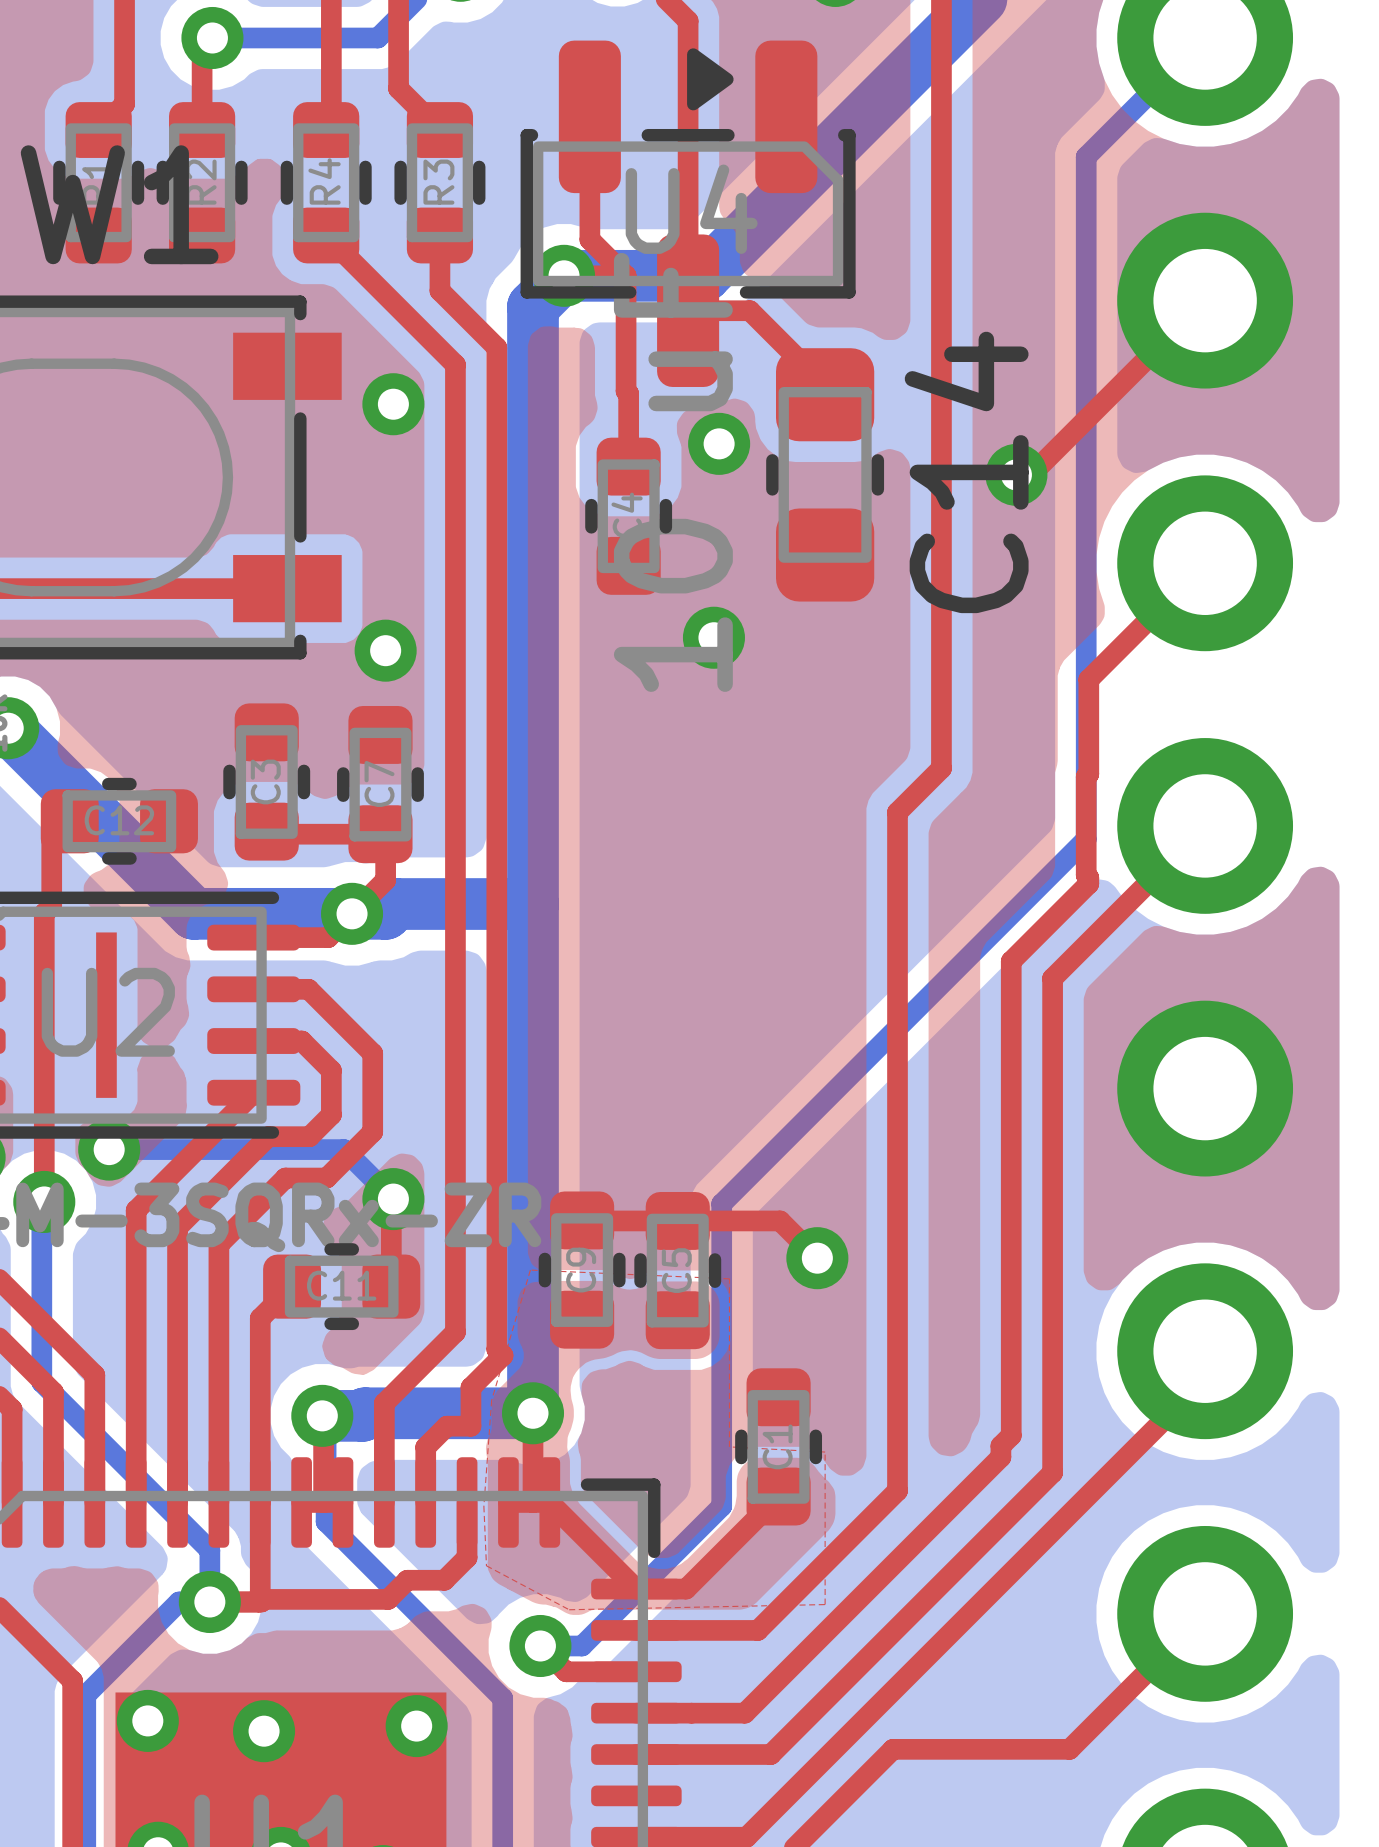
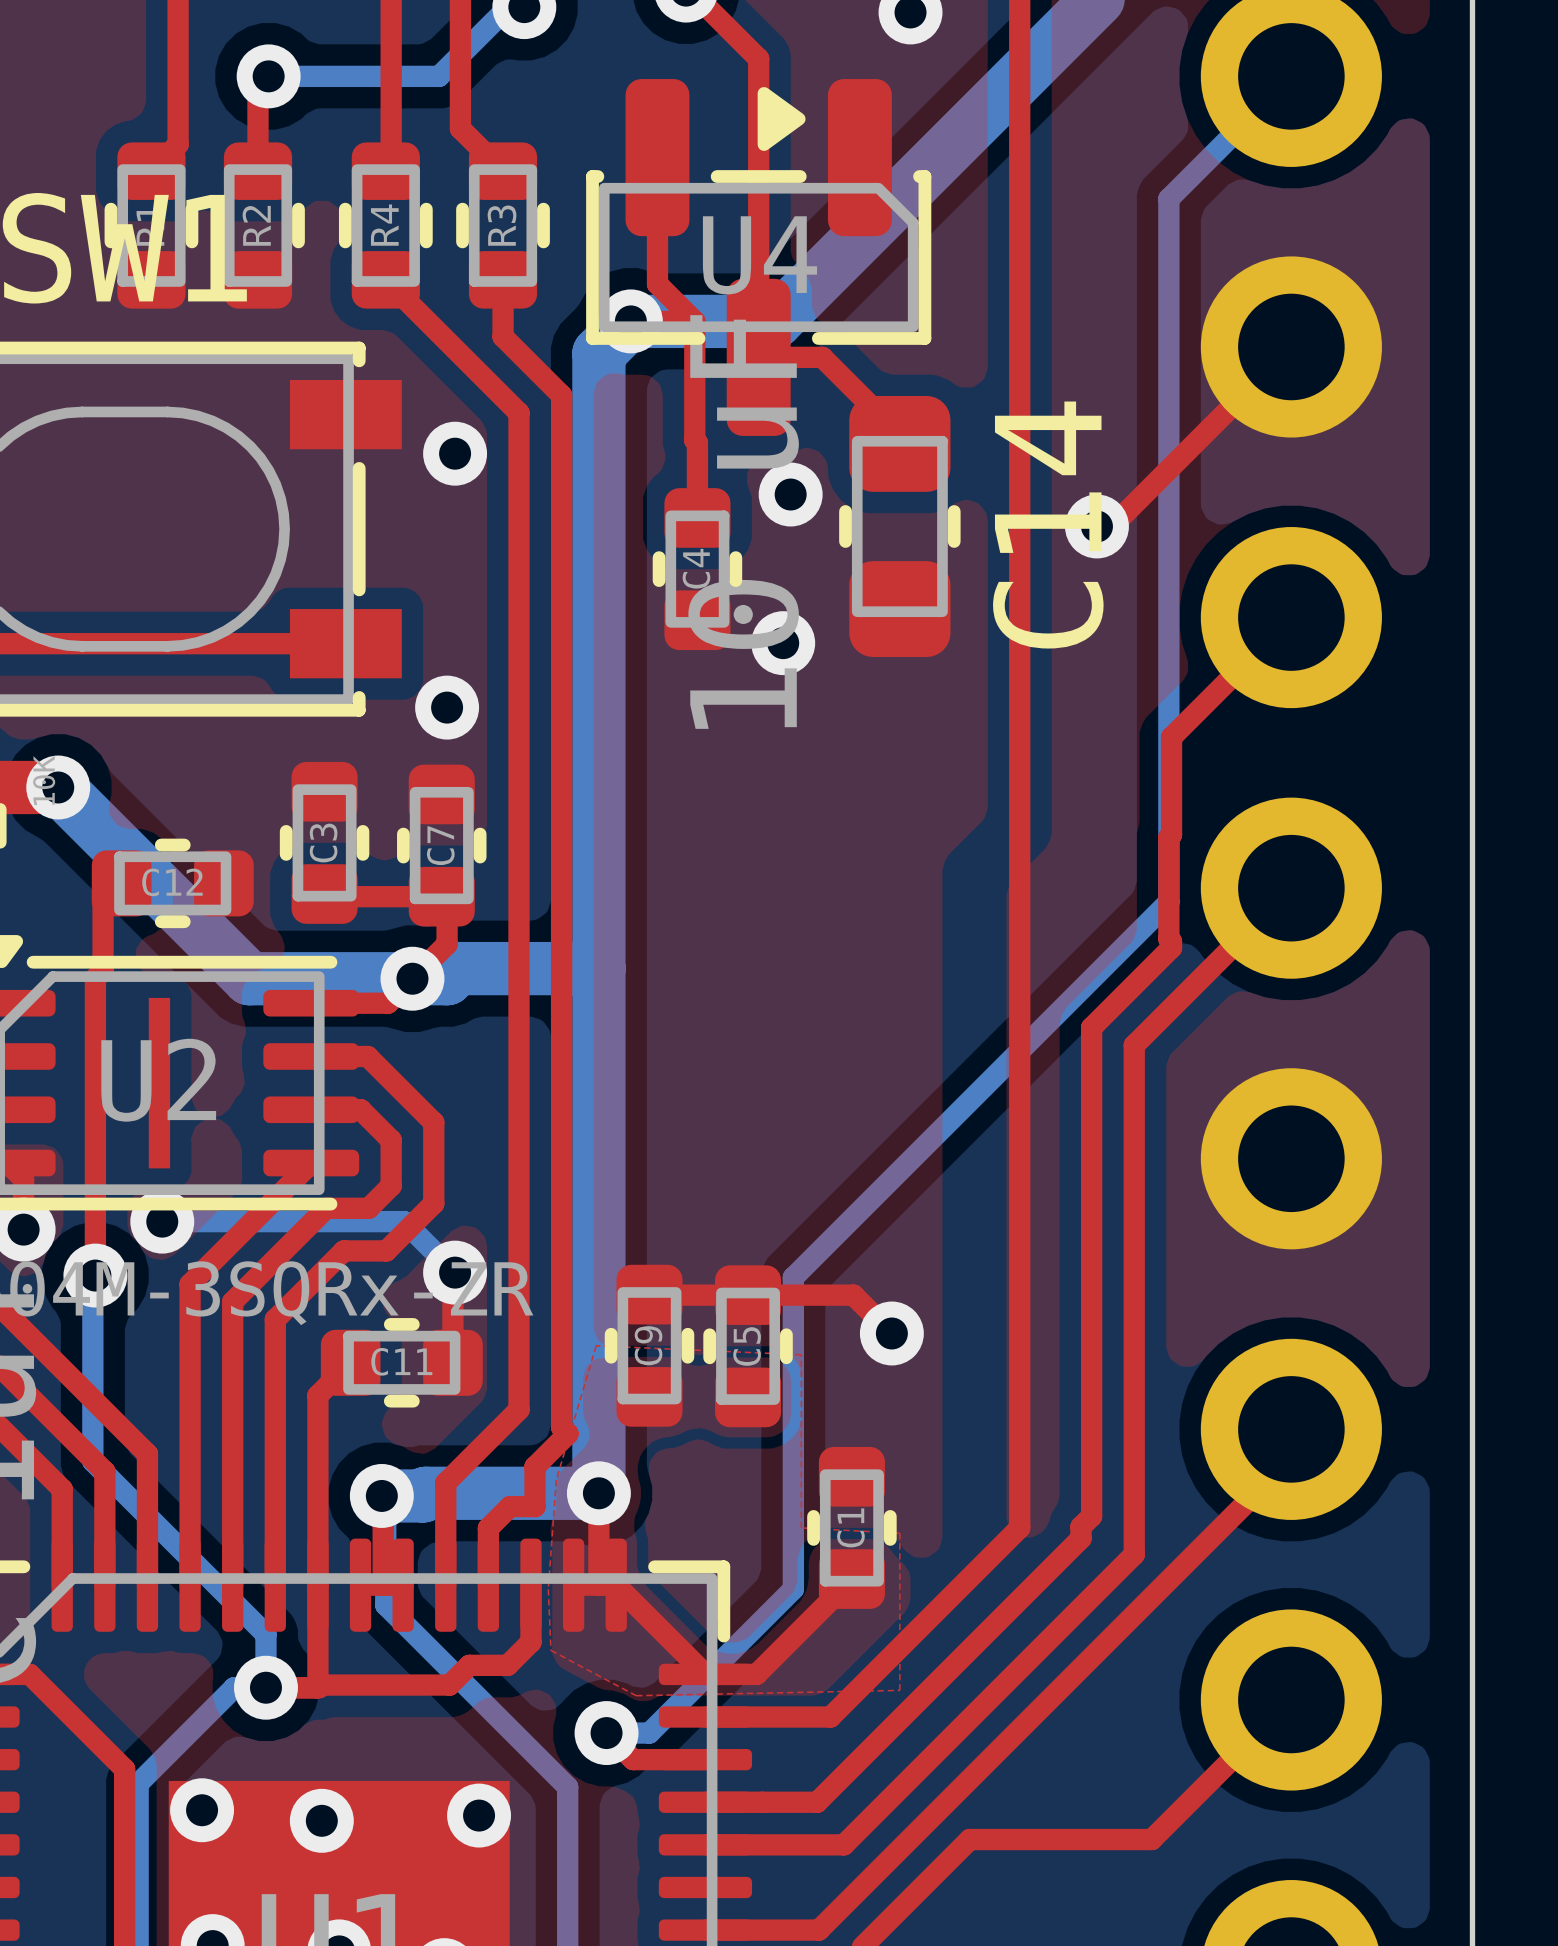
via position: (713, 637) -> (783, 643)
top track: (941, 768) (897, 812) (897, 1490) -> (1019, 828) (1019, 1527) (974, 1573)

